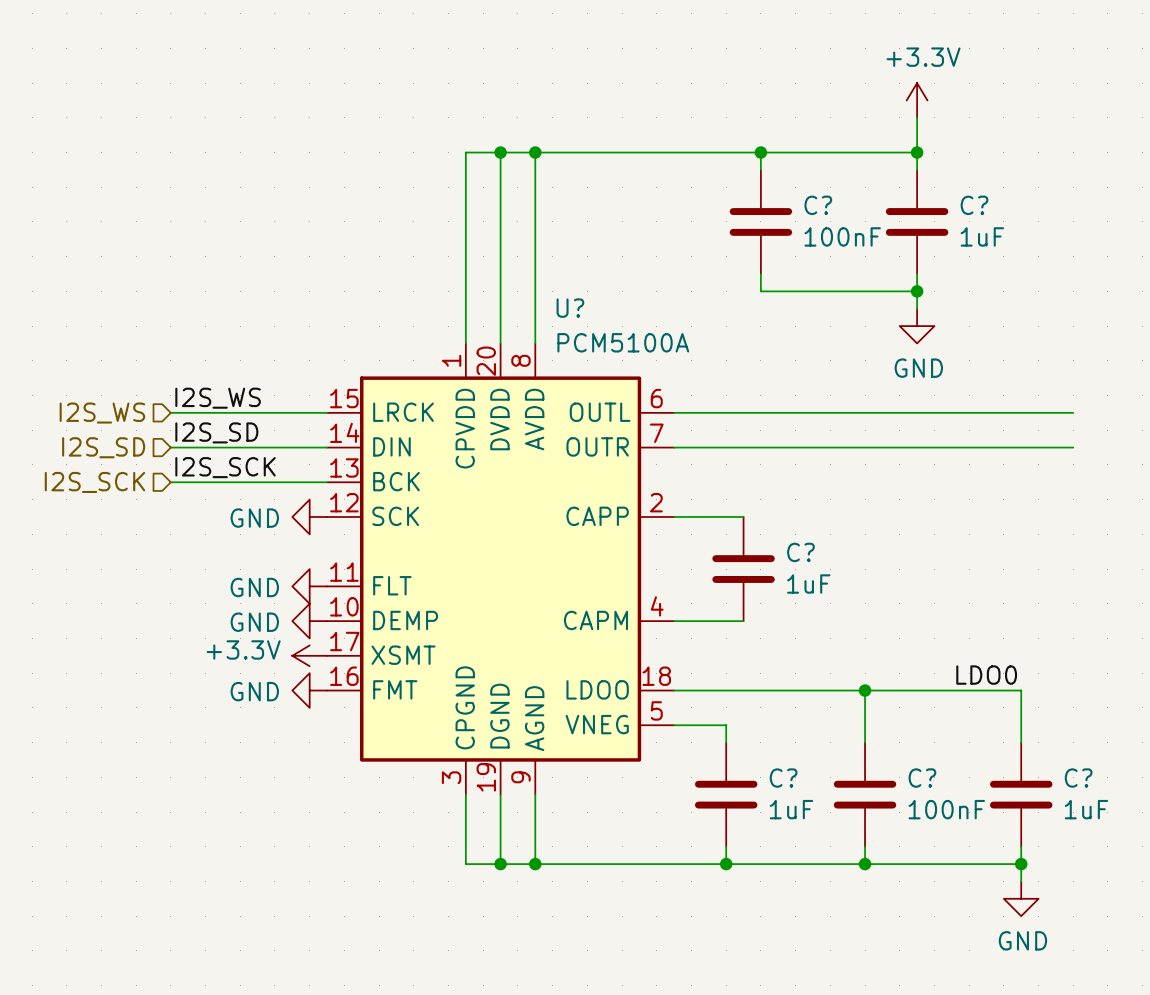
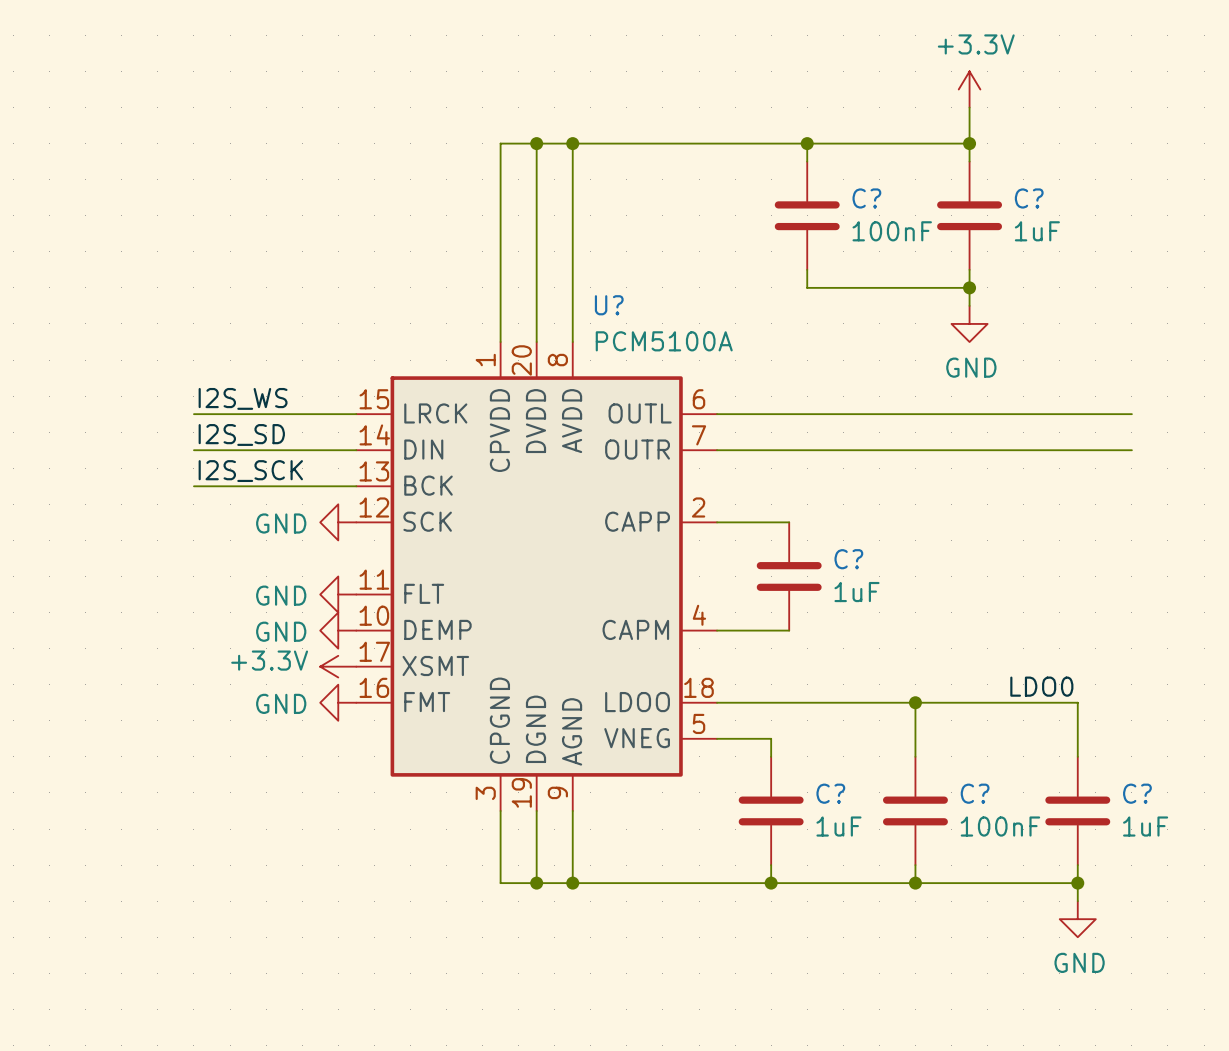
hierarchical label: I2S_WS (102, 413) -> none
hierarchical label: I2S_SD (103, 447) -> none
hierarchical label: I2S_SCK (94, 482) -> none

